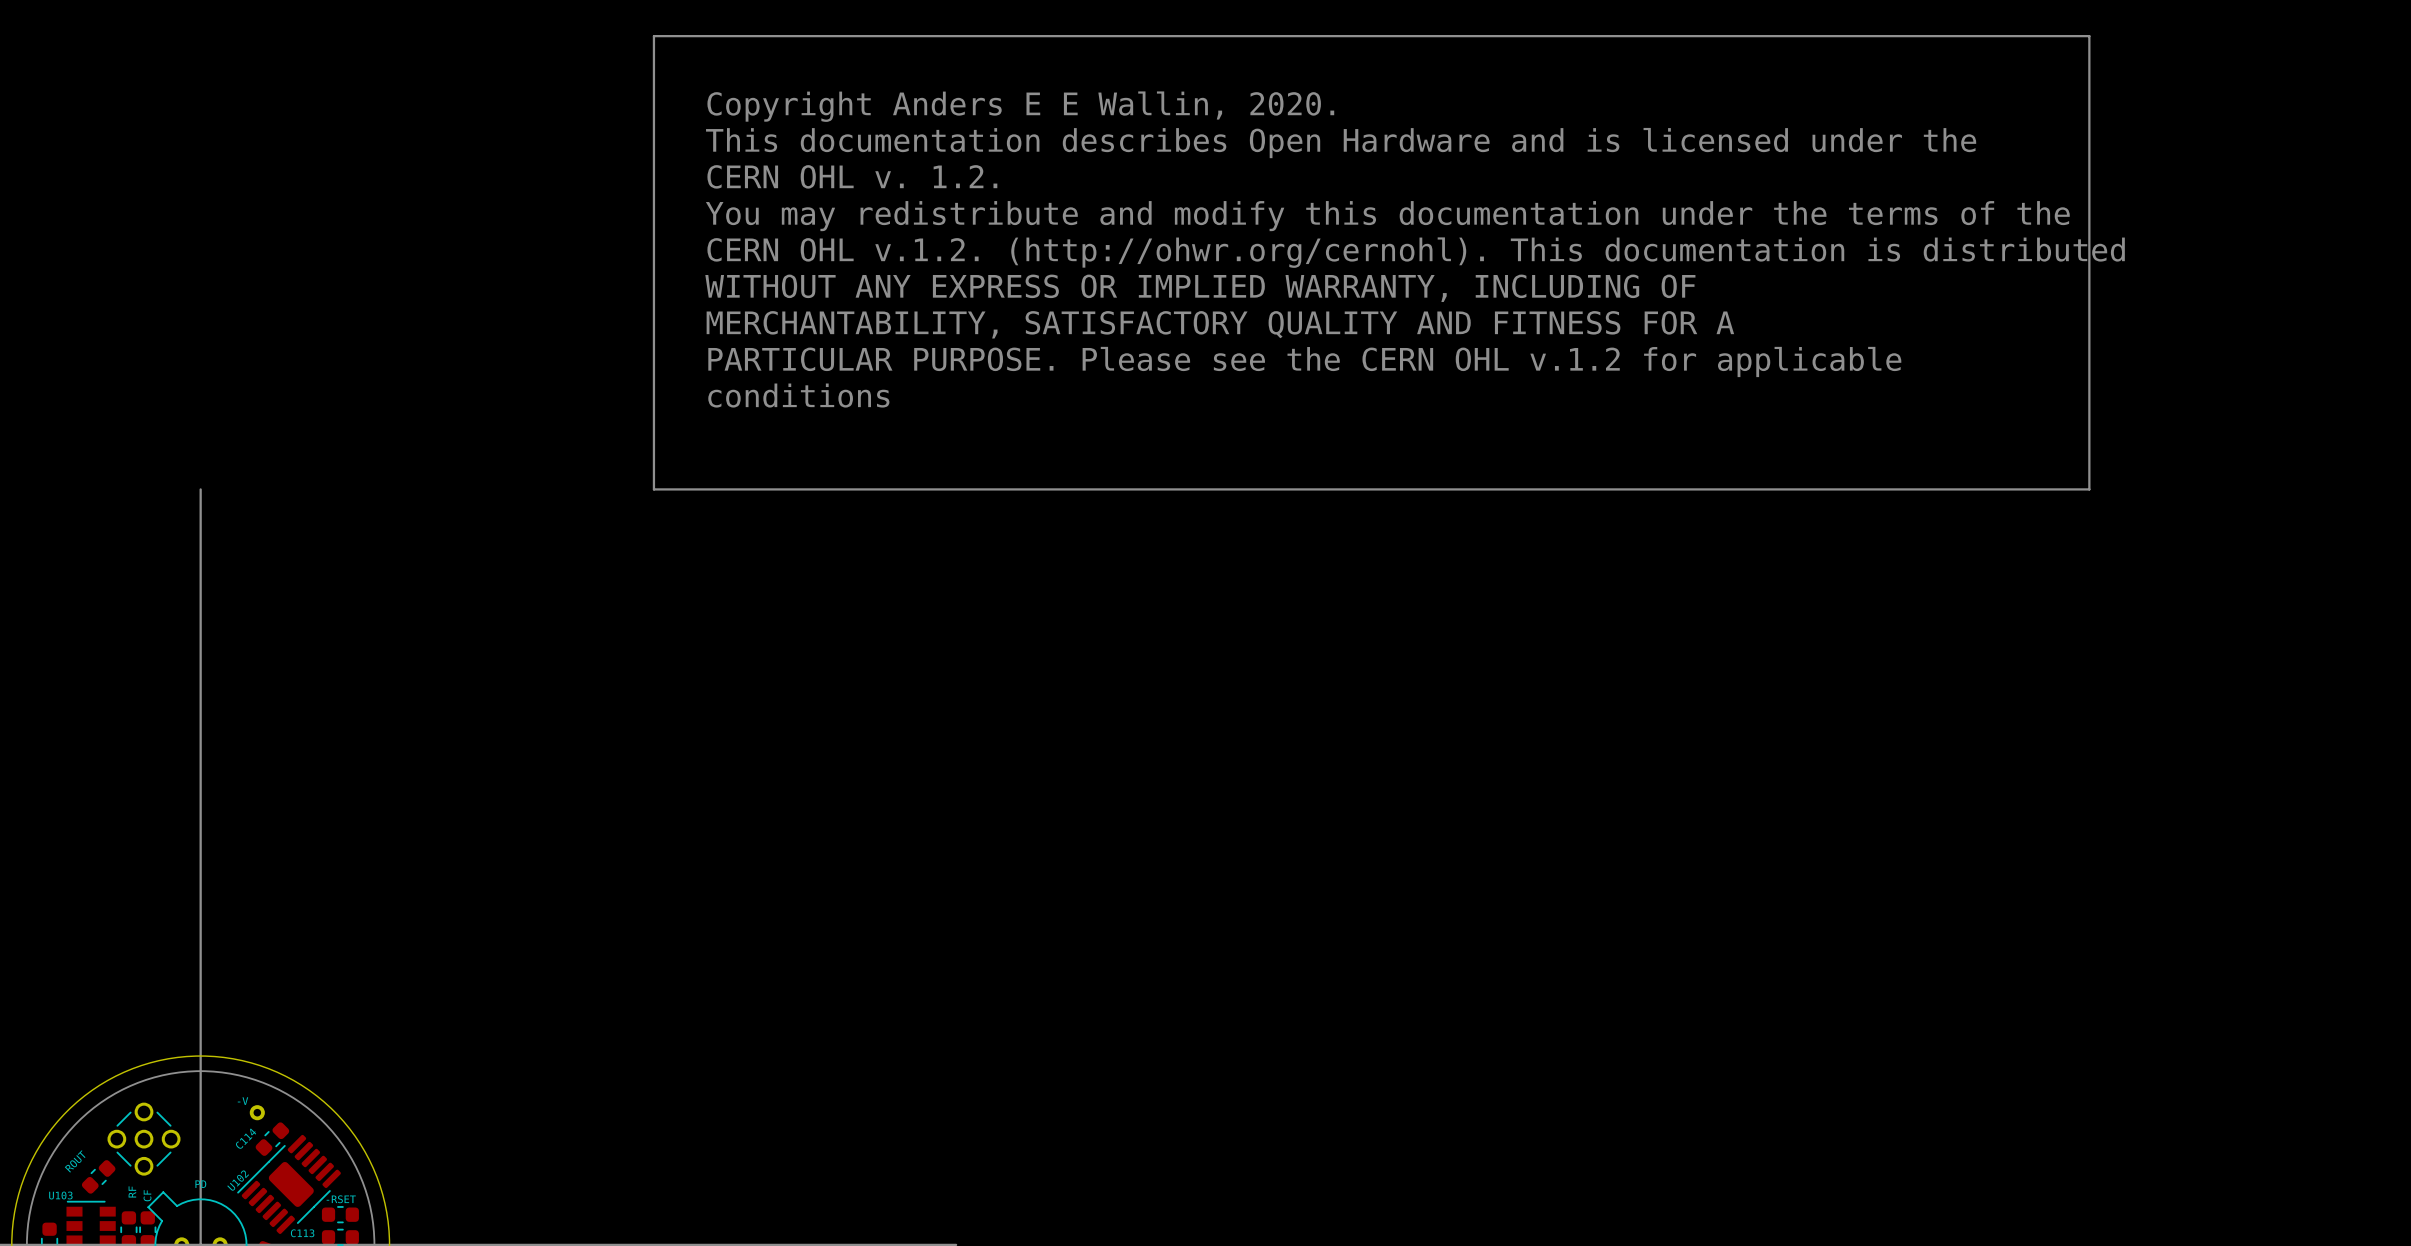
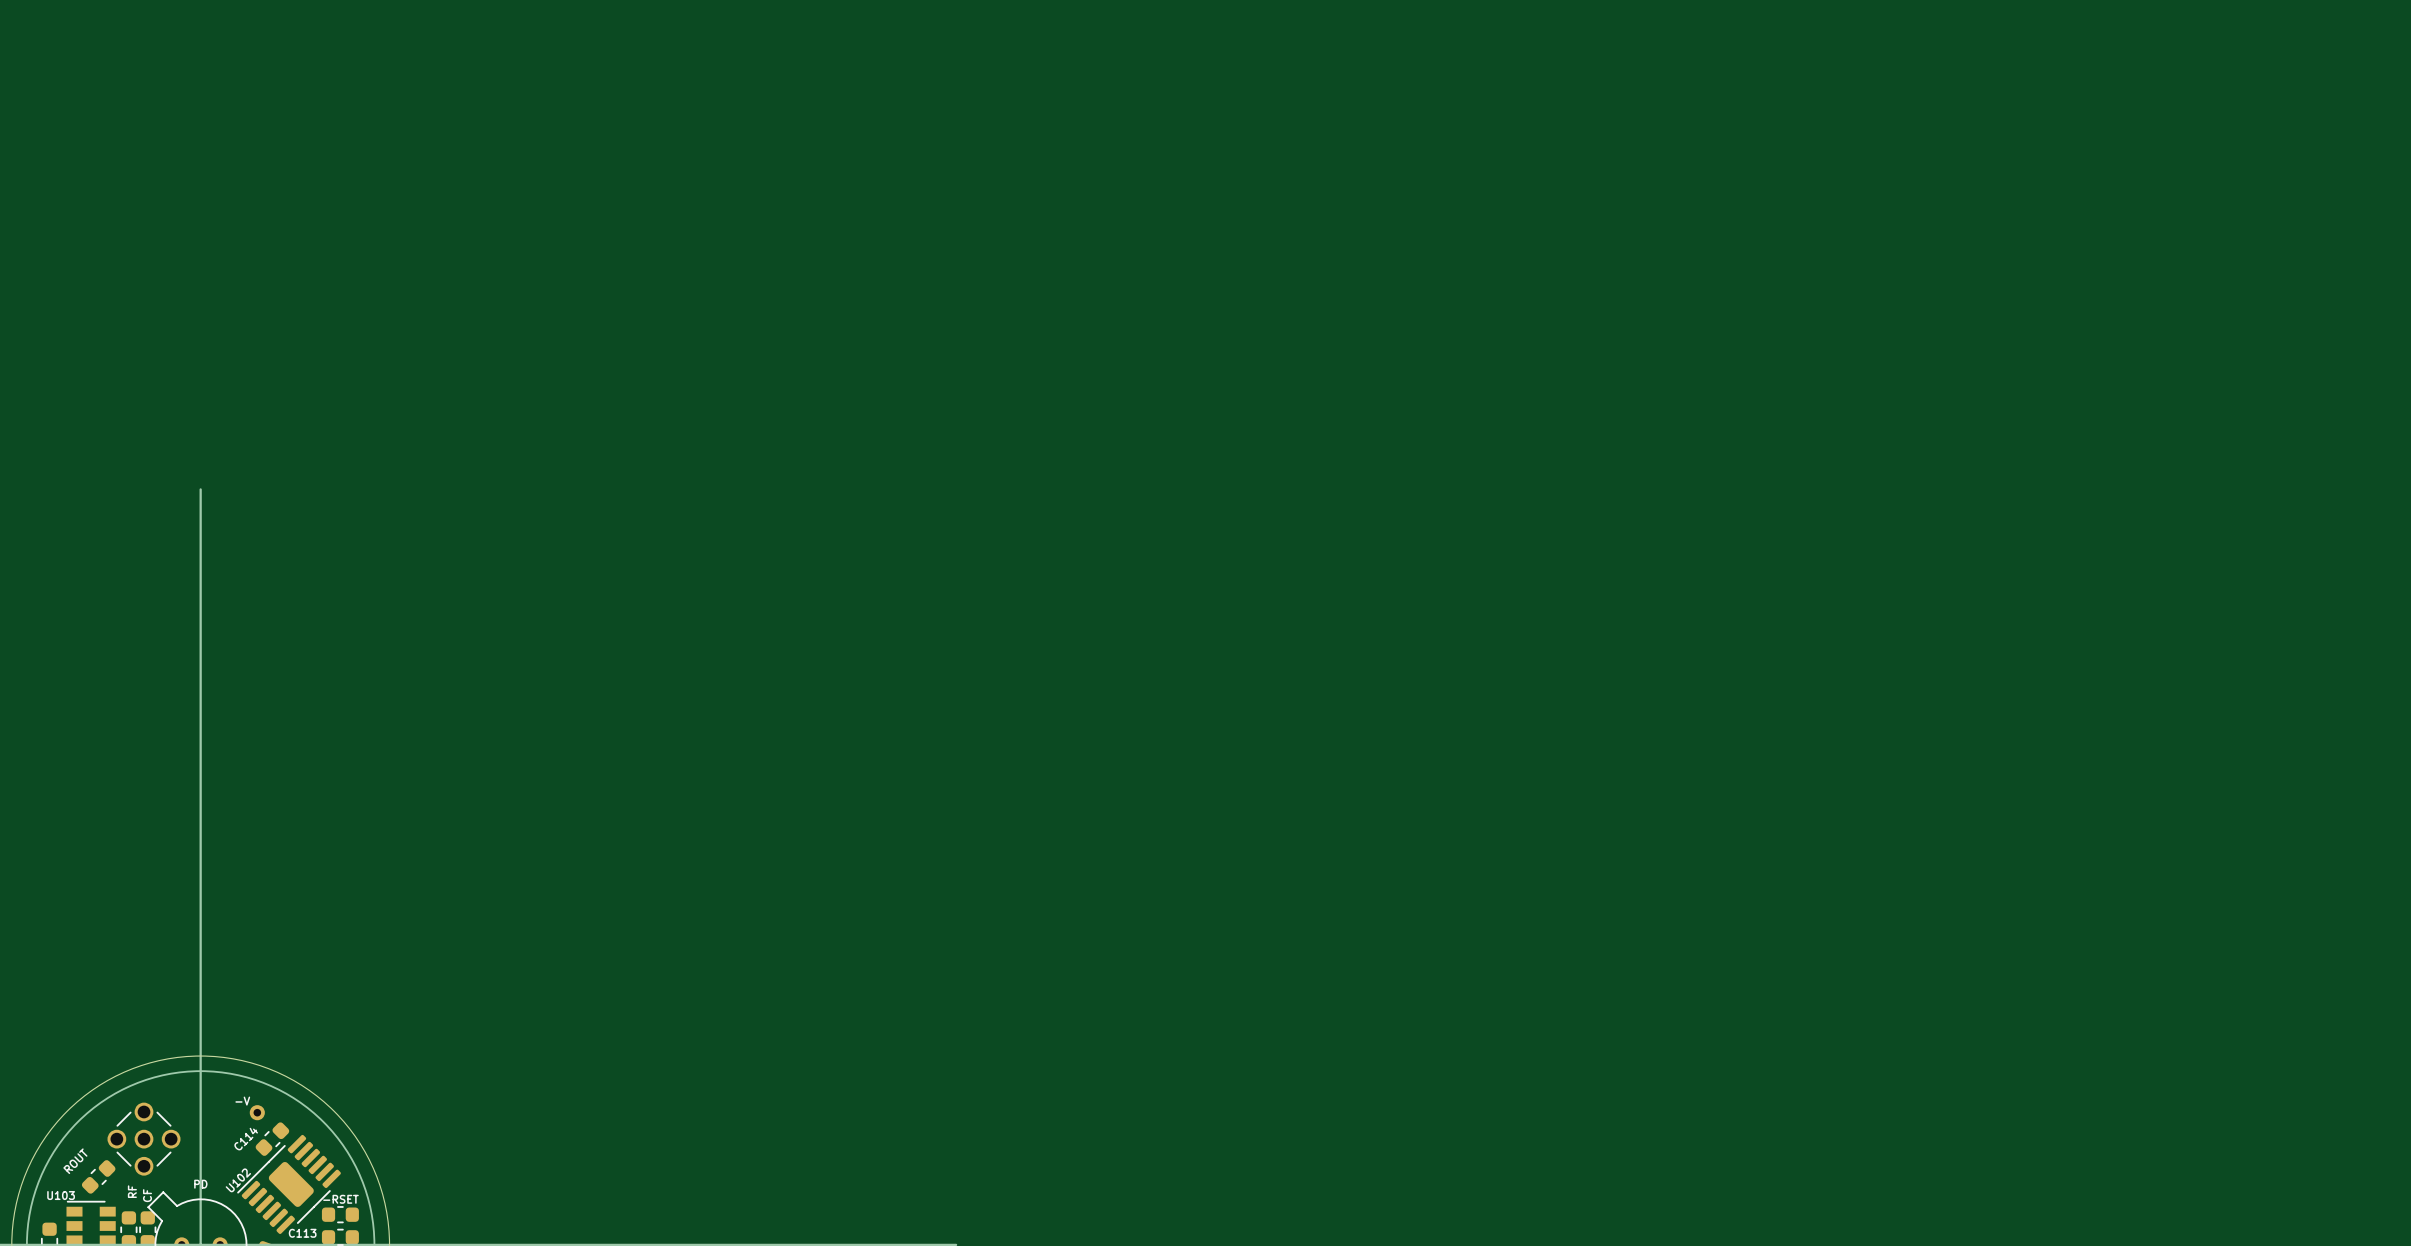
line: (653, 36) (653, 489) (2089, 489) (2089, 36) (653, 36) -> none
text: Copyright Anders E E Wallin, 2020. (1020, 106) -> none
text: This documentation describes Open Hardware and is licensed under the (1341, 143) -> none
text: CERN OHL v. 1.2. (852, 176) -> none
text: You may redistribute and modify this documentation under the terms of the (1387, 216) -> none
text: CERN OHL v.1.2. (http://ohwr.org/cernohl). This documentation is distributed (1416, 252) -> none
text: WITHOUT ANY EXPRESS OR IMPLIED WARRANTY, INCLUDING OF (1200, 288) -> none
text: MERCHANTABILITY, SATISFACTORY QUALITY AND FITNESS FOR A (1220, 324) -> none
text: PARTICULAR PURPOSE. Please see the CERN OHL v.1.2 for applicable (1304, 361) -> none
text: conditions (798, 395) -> none

